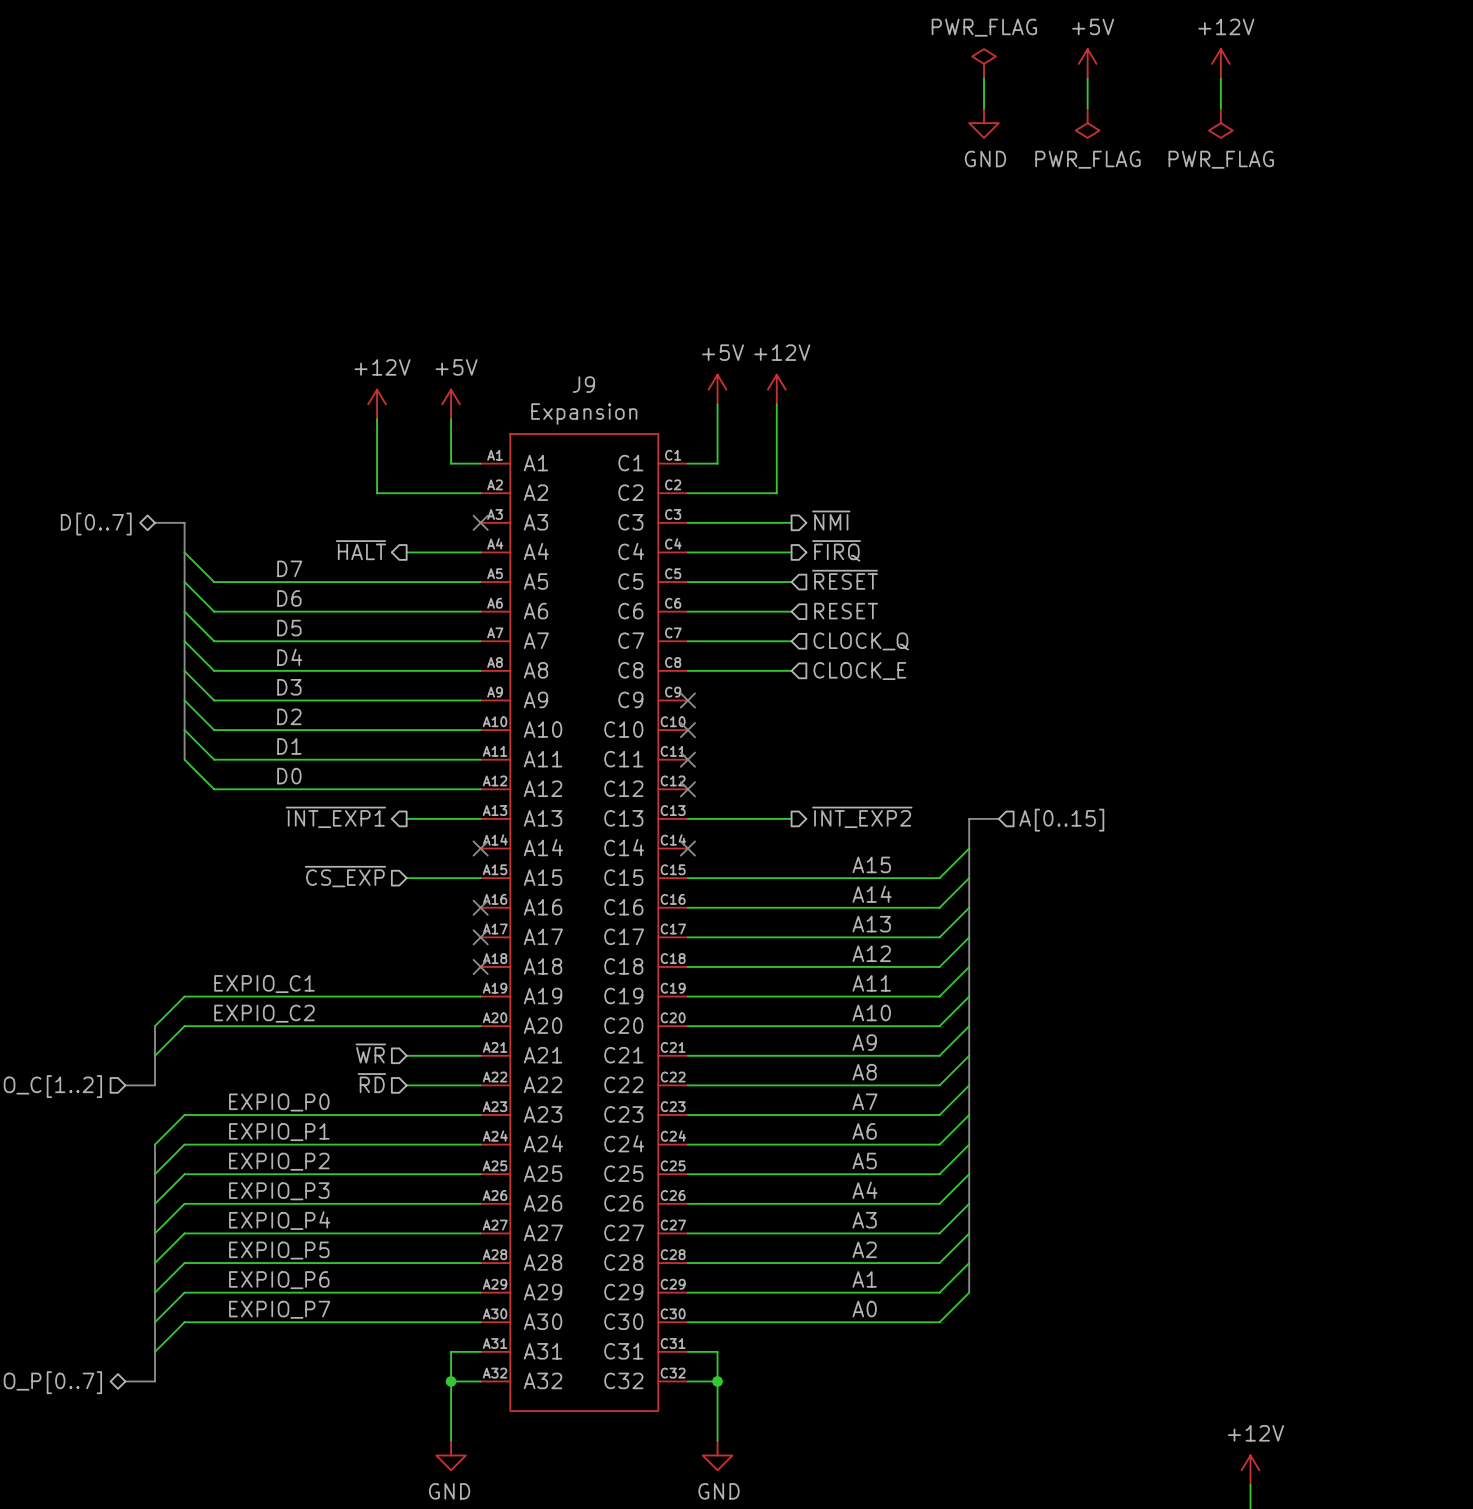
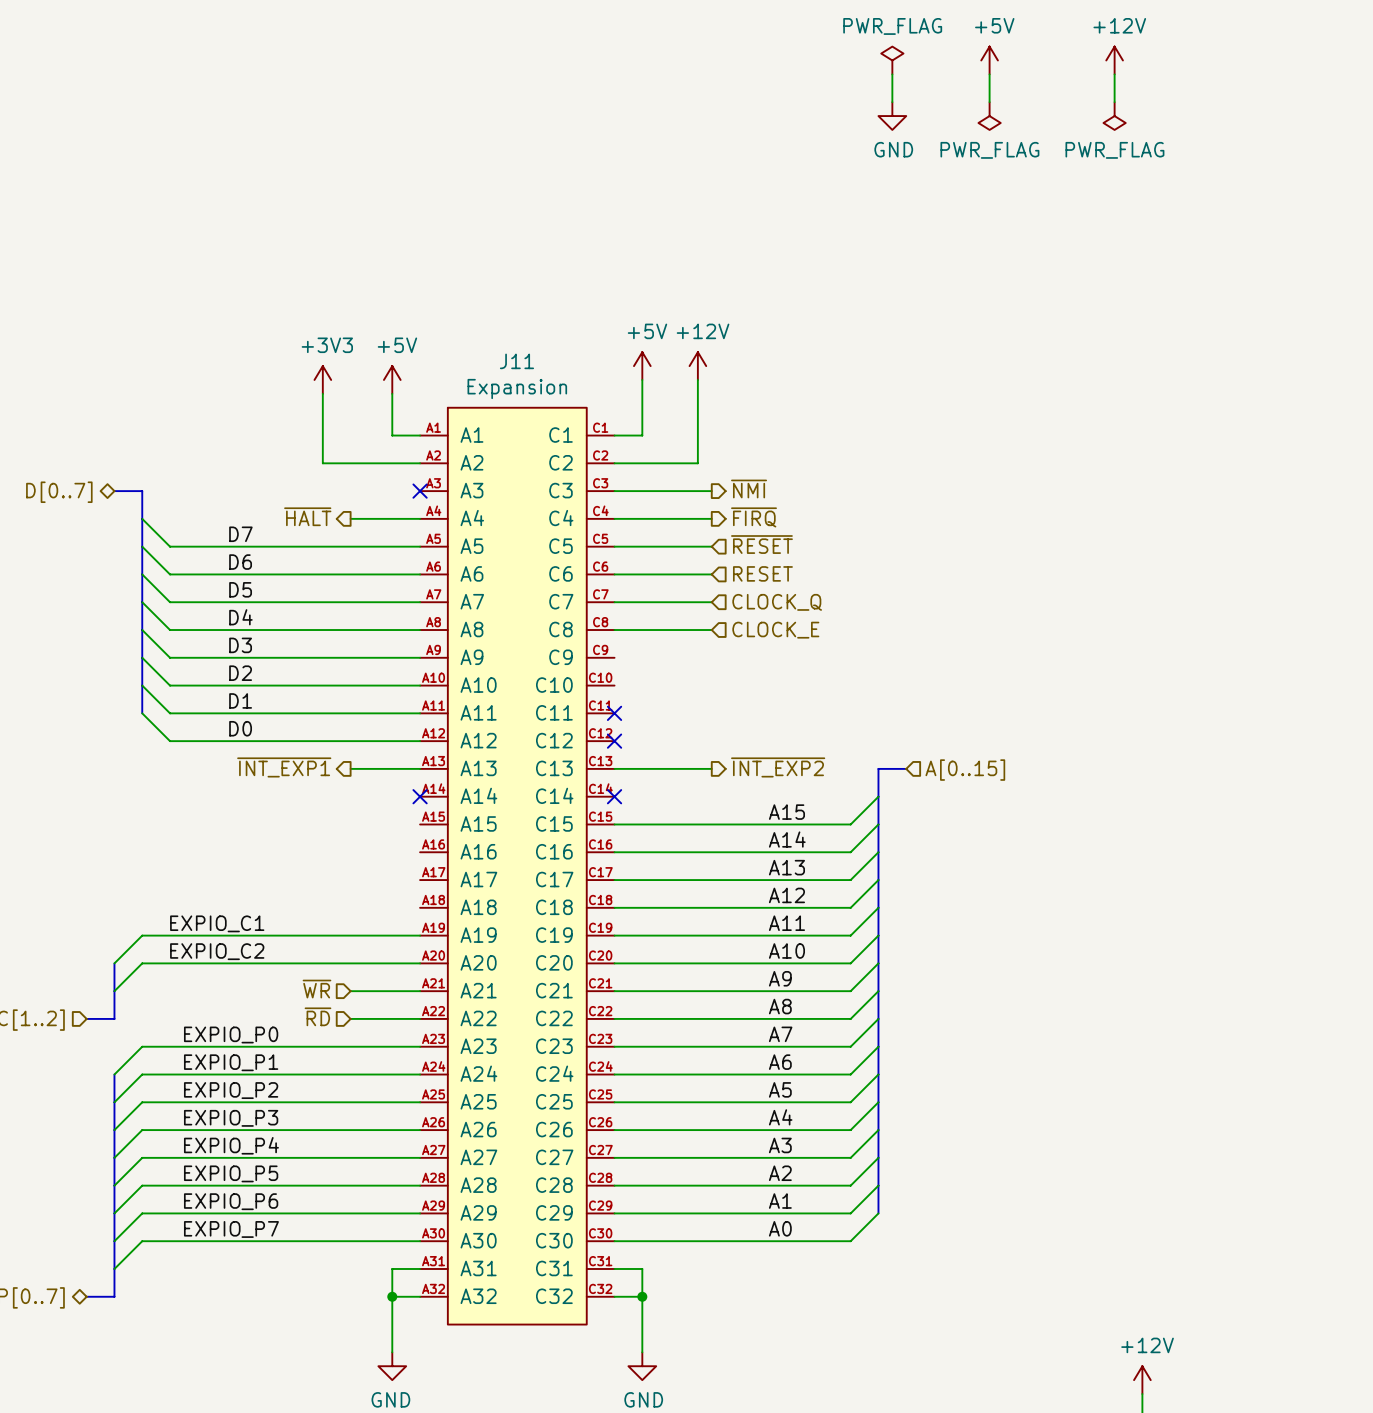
J9 name: J9 (583, 384) -> J11 (516, 361)
power symbol: +12V (377, 404) -> +3V3 (322, 379)
no-connect mark: (687, 700) -> none
no-connect mark: (687, 730) -> none
hierarchical label: ~{CS_EXP} (345, 876) -> none
wire: (406, 878) (480, 878) -> none
no-connect mark: (480, 907) -> none
no-connect mark: (480, 937) -> none
no-connect mark: (480, 966) -> none

